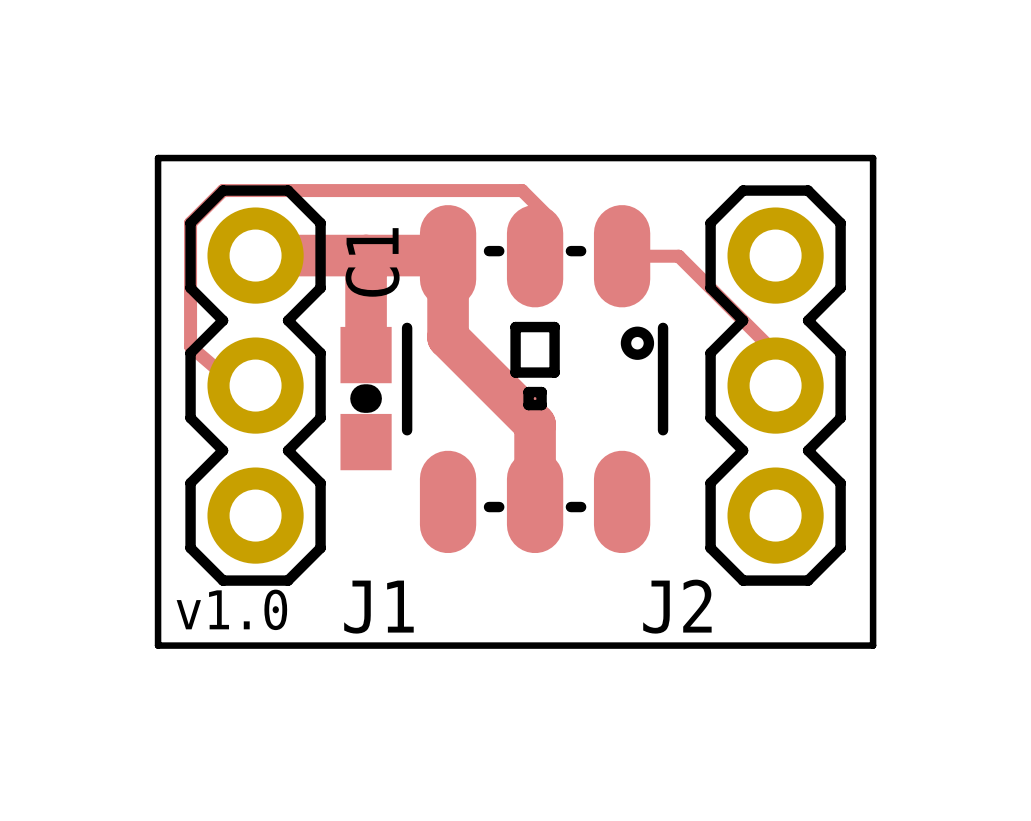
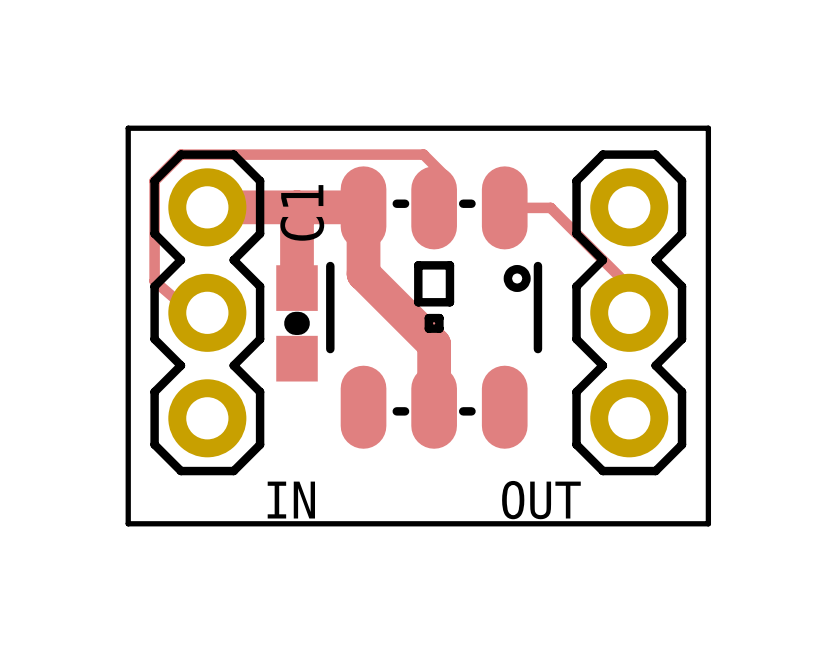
J2 name: J2 (677, 606) -> OUT (541, 500)
J1 name: J1 (378, 607) -> IN (291, 500)
text: v1.0 (231, 609) -> none

